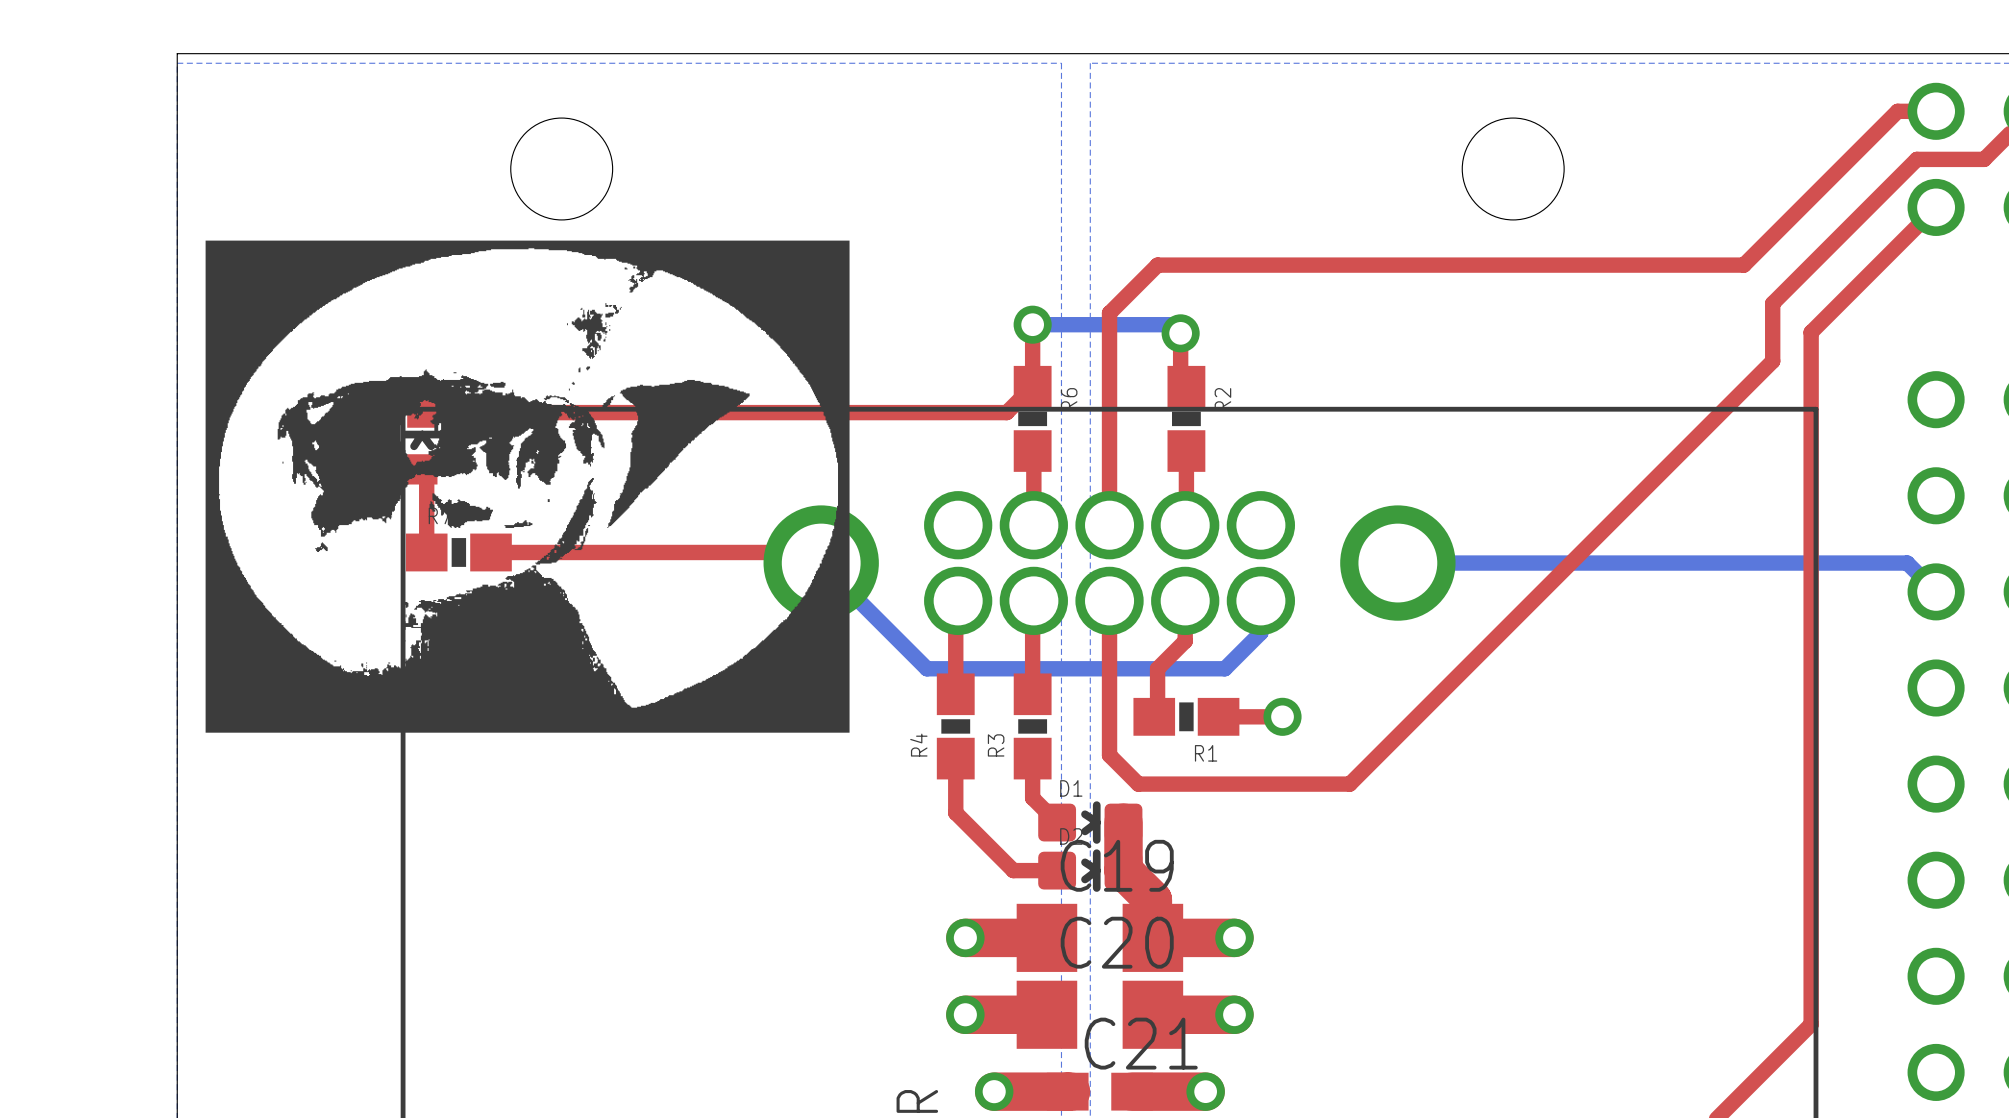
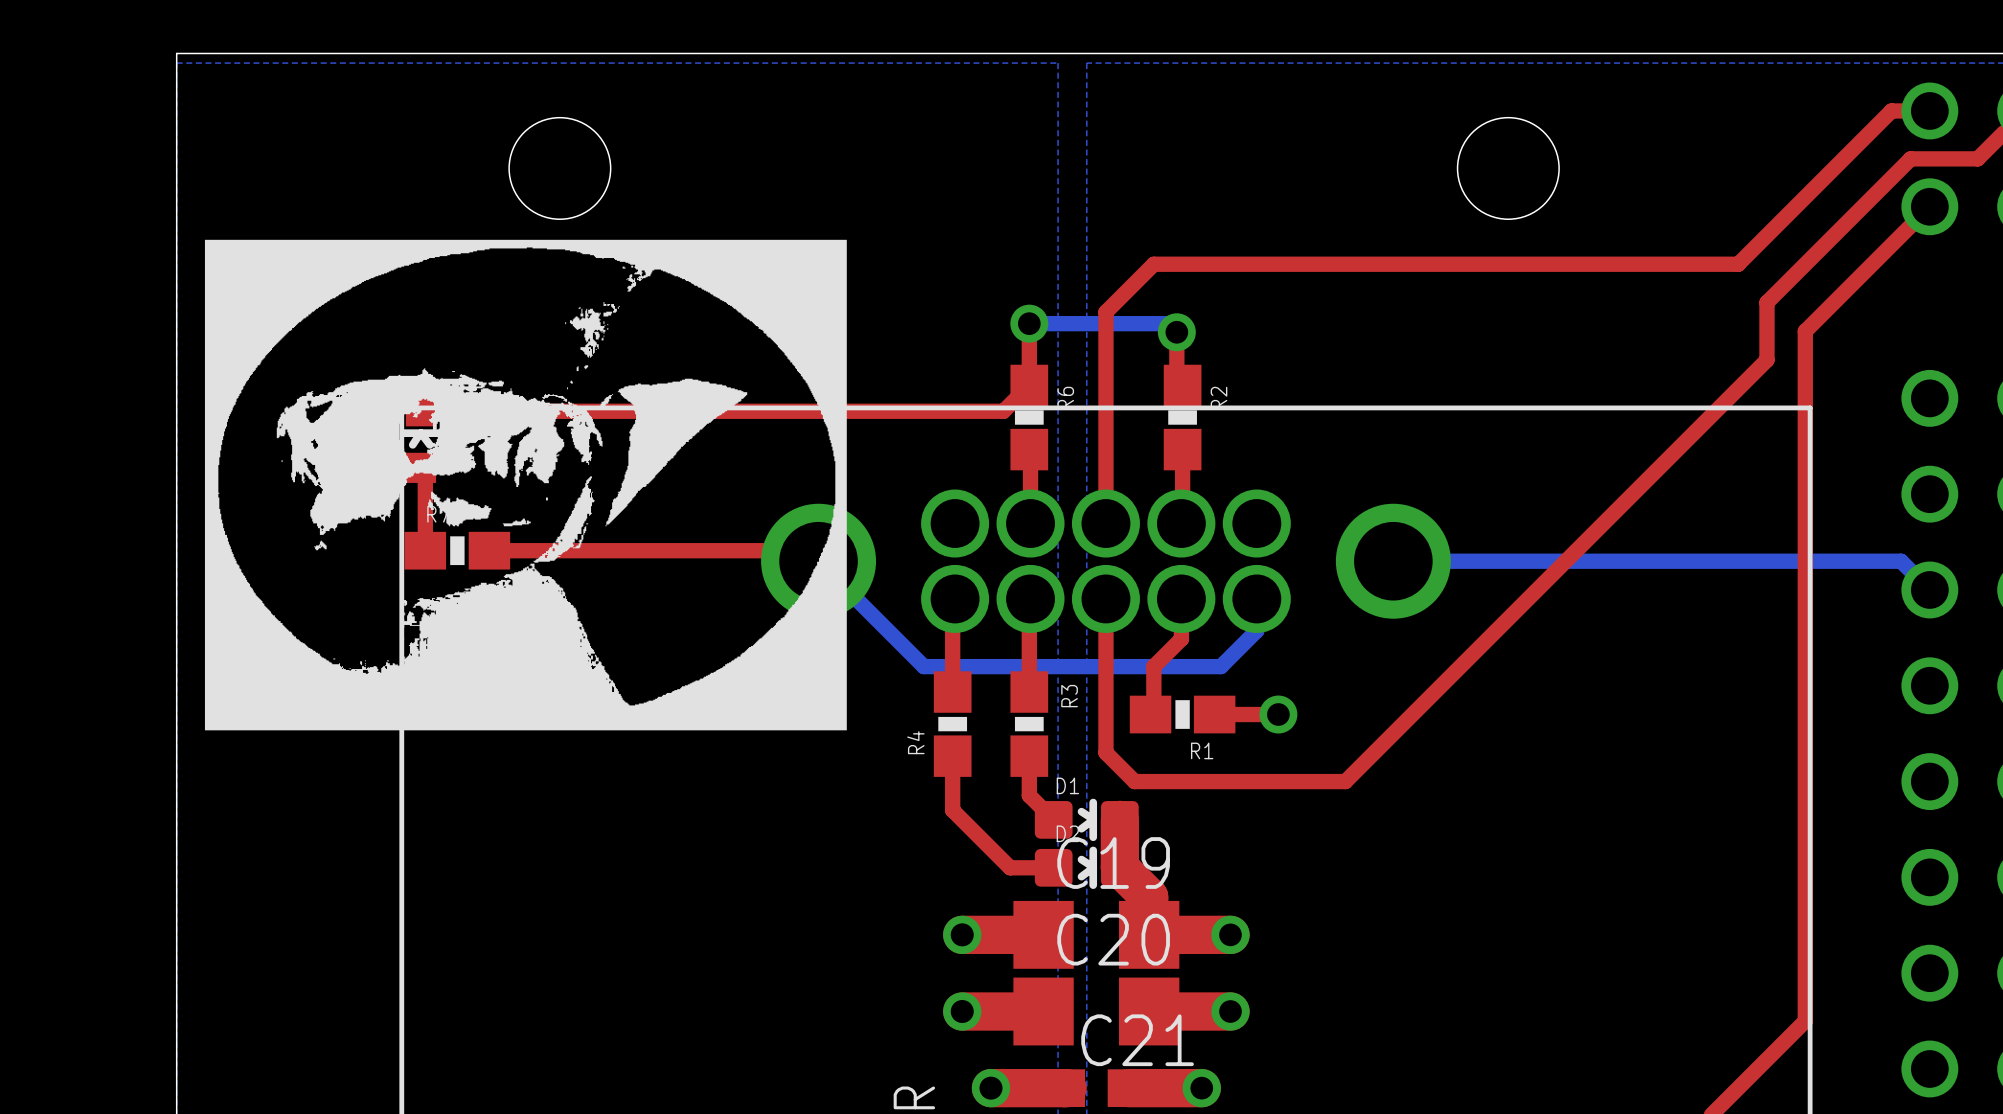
R3 name position: R3 (996, 745) -> R3 (1069, 696)

